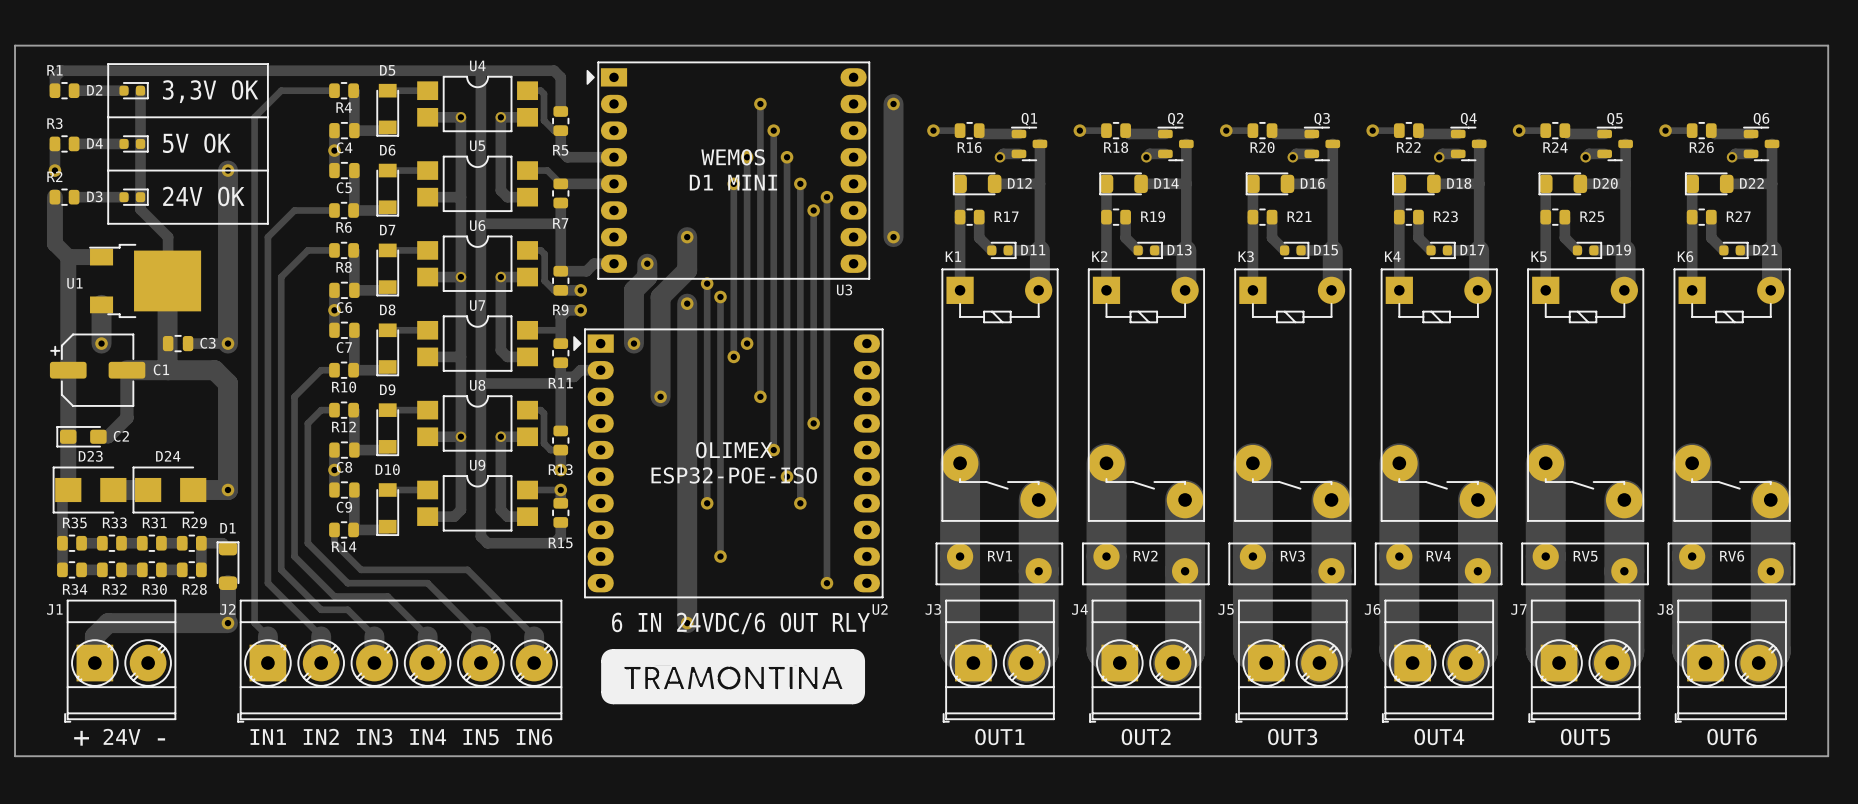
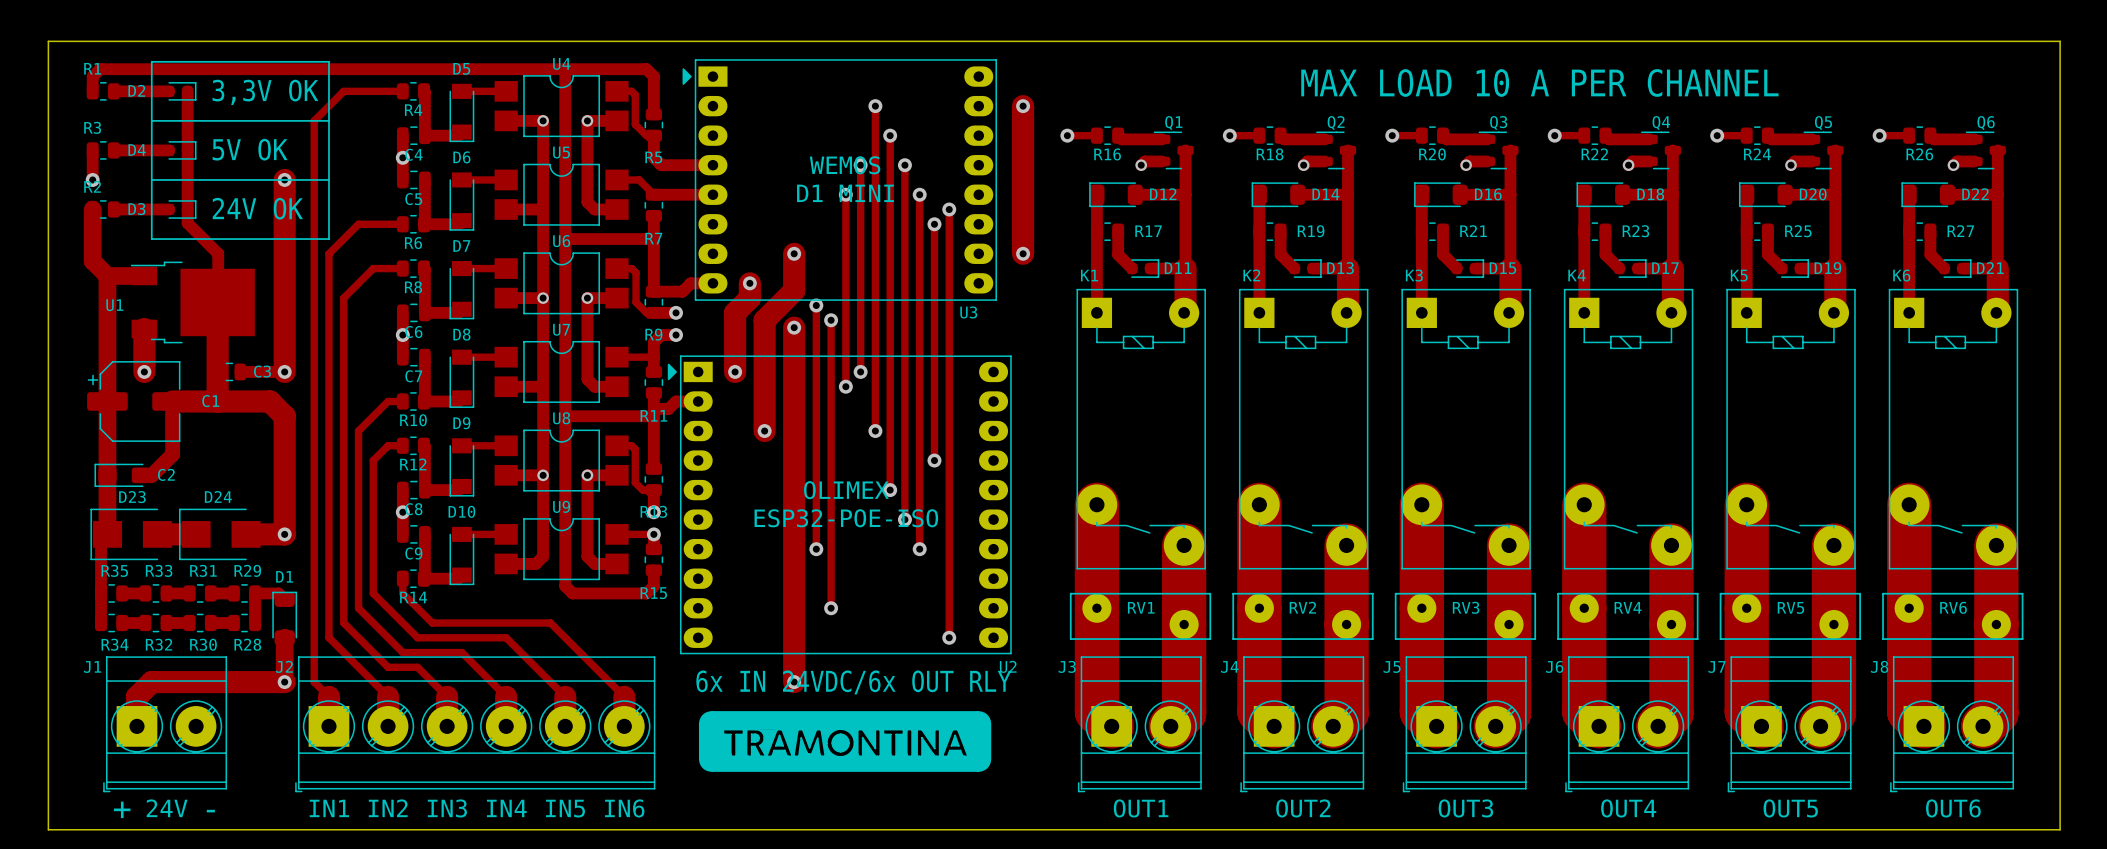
text: none -> MAX LOAD 10 A PER CHANNEL (1539, 82)
text: 6 IN 24VDC/6 OUT RLY (740, 623) -> 6x IN 24VDC/6x OUT RLY (853, 682)

